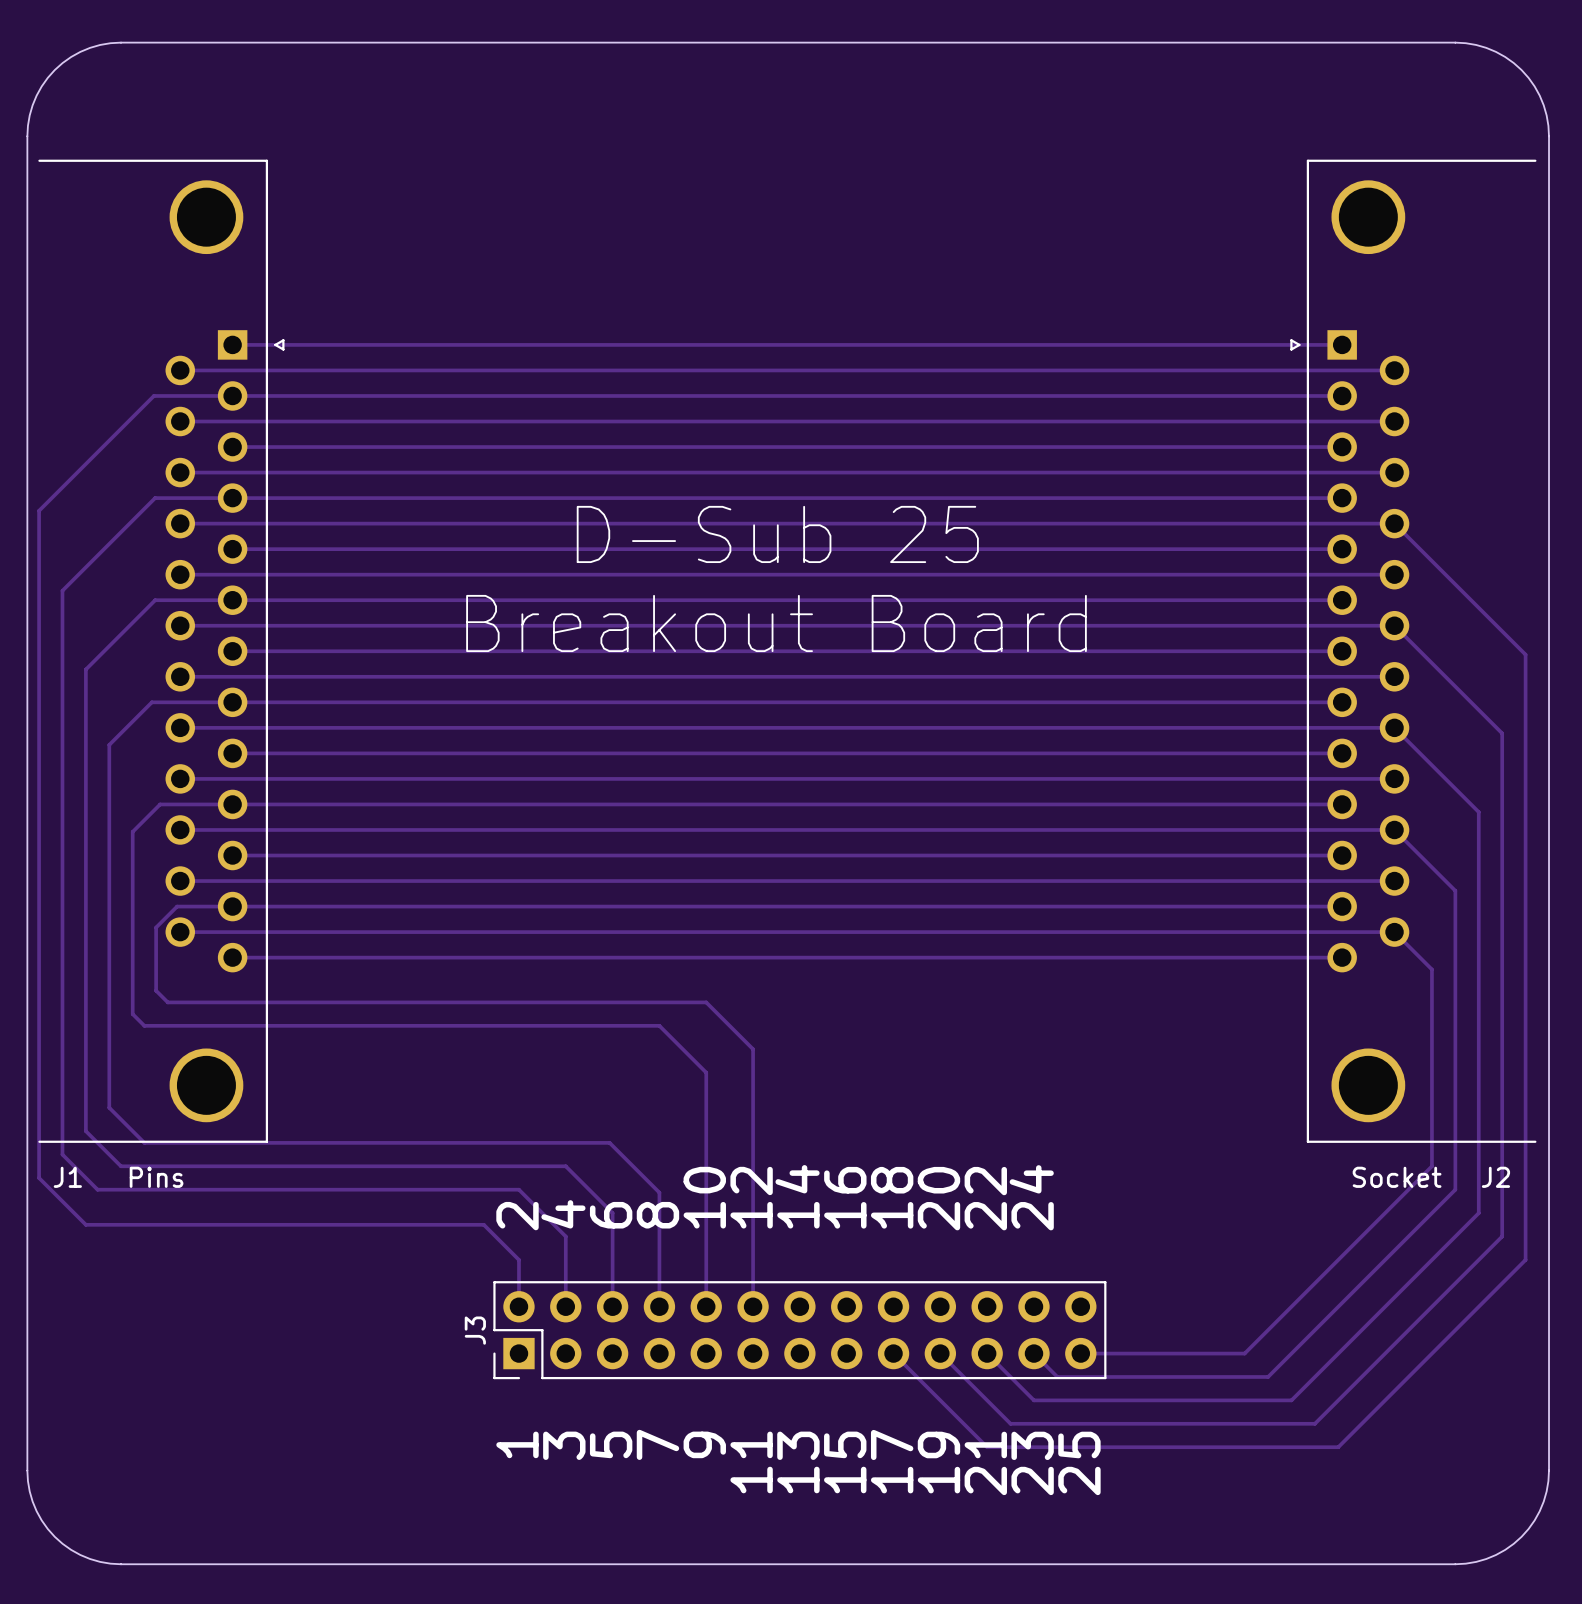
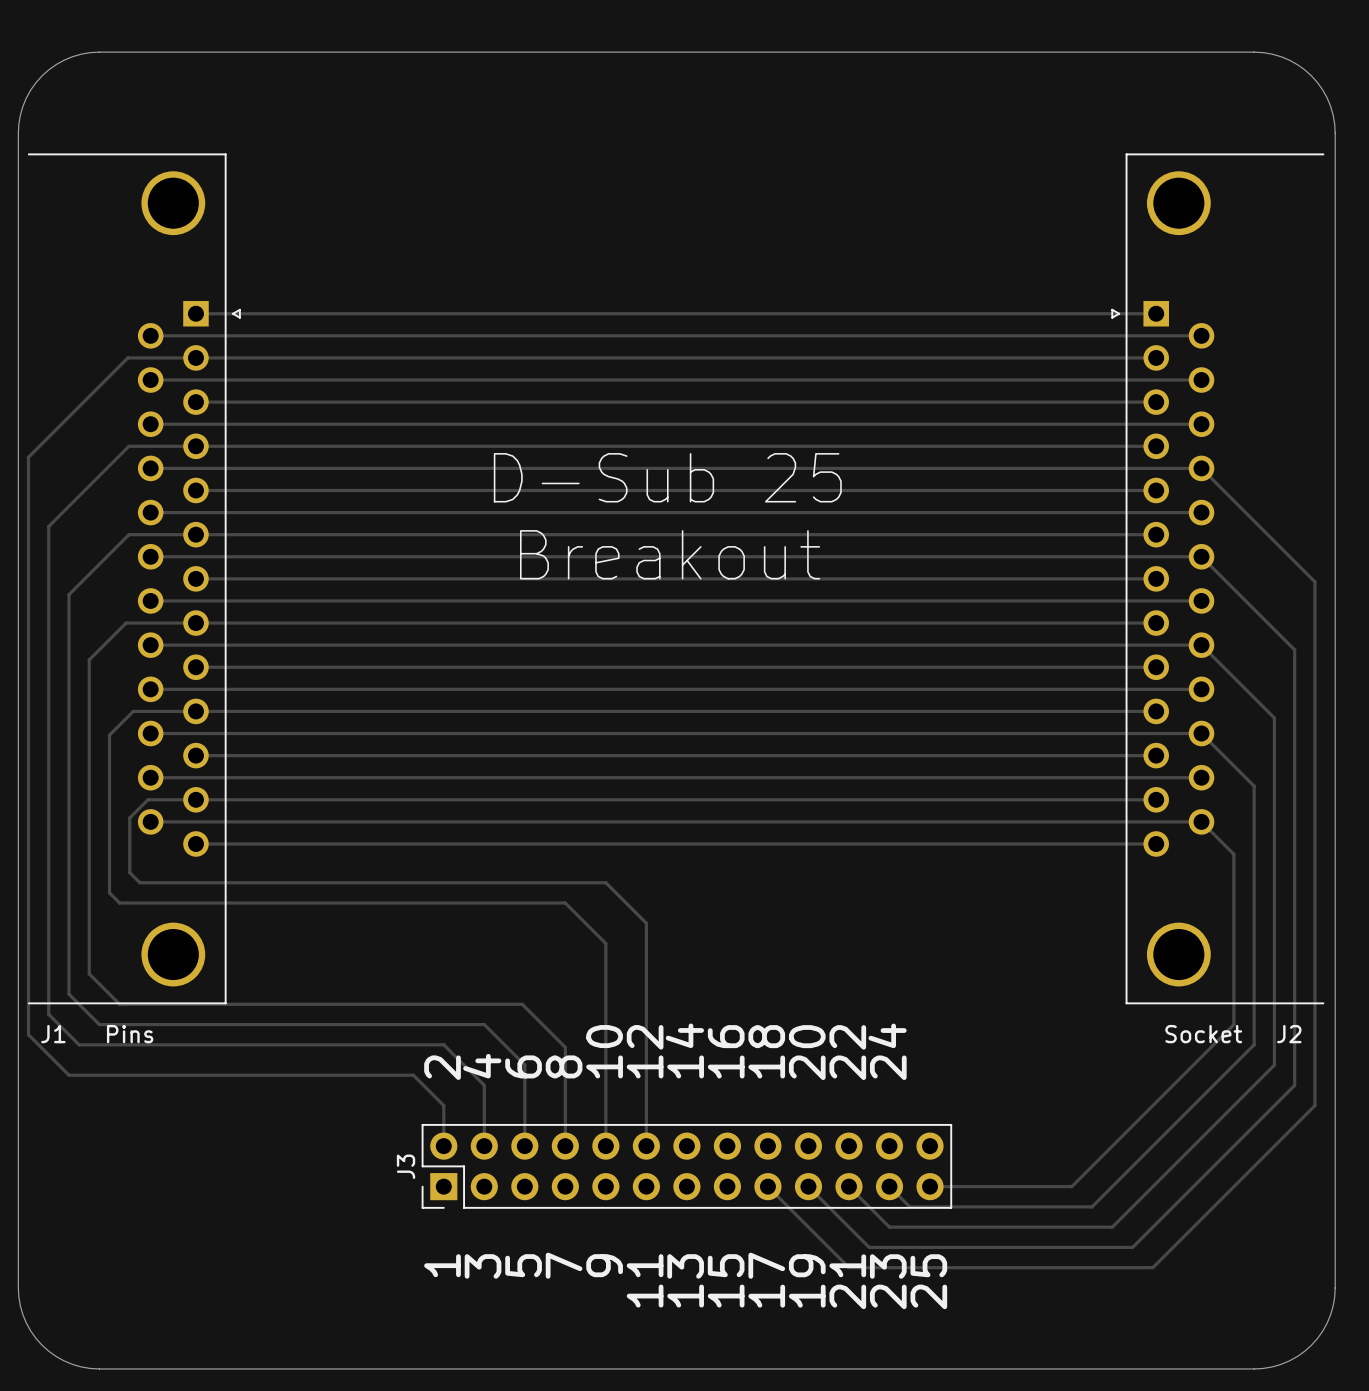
text: Breakout Board (776, 623) -> Breakout (670, 554)

